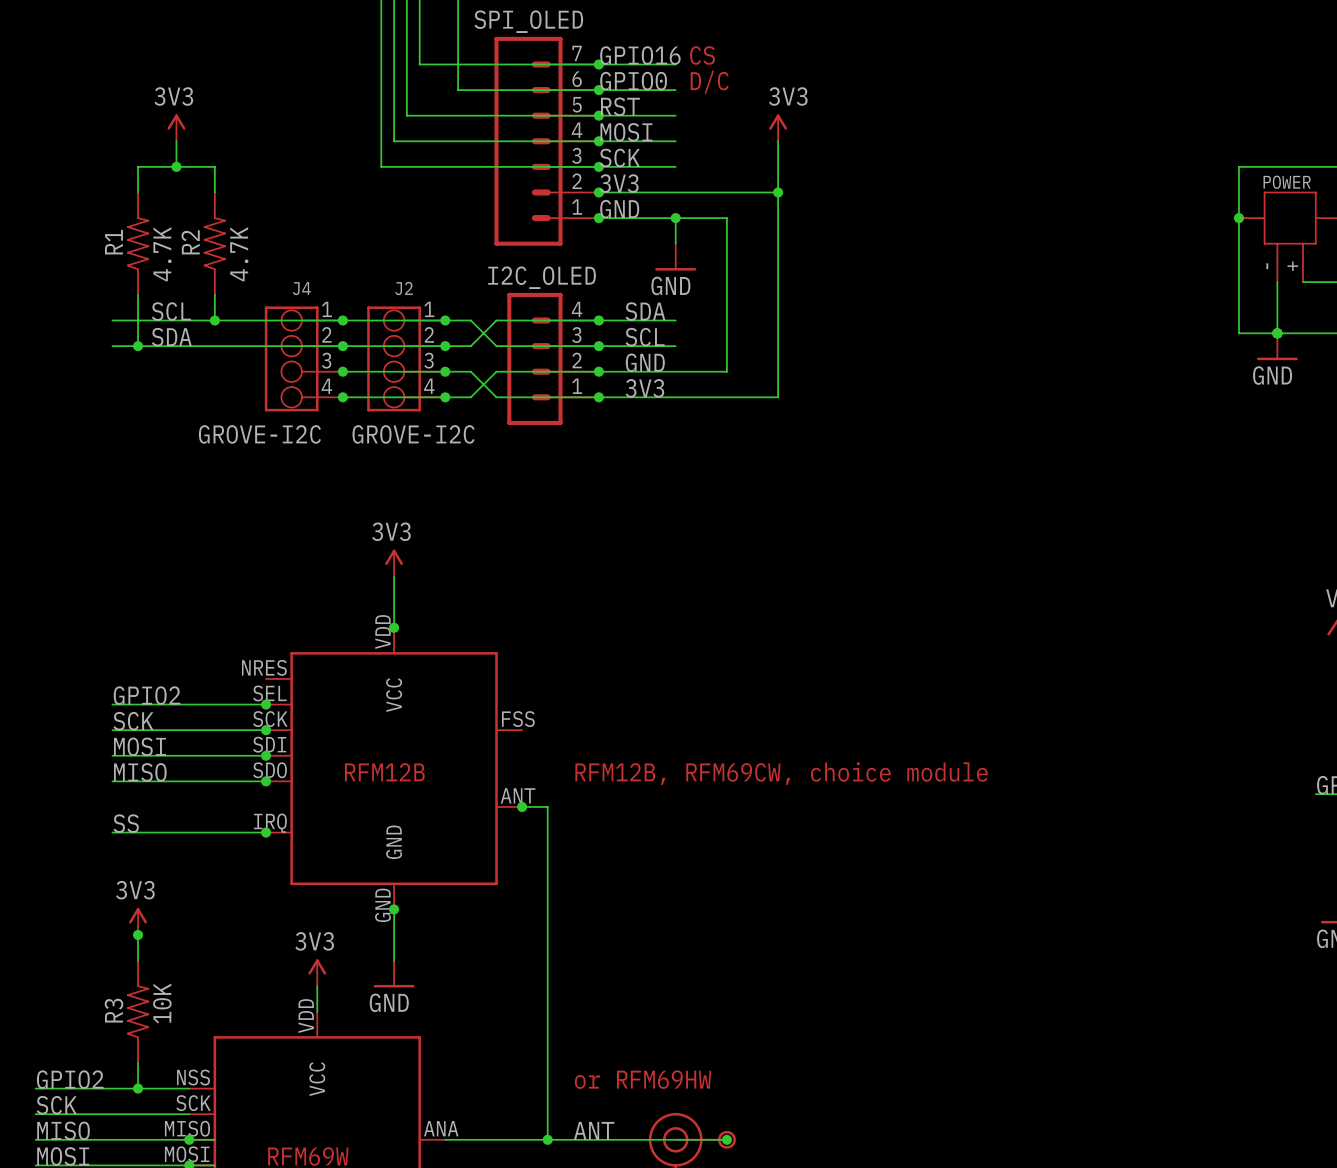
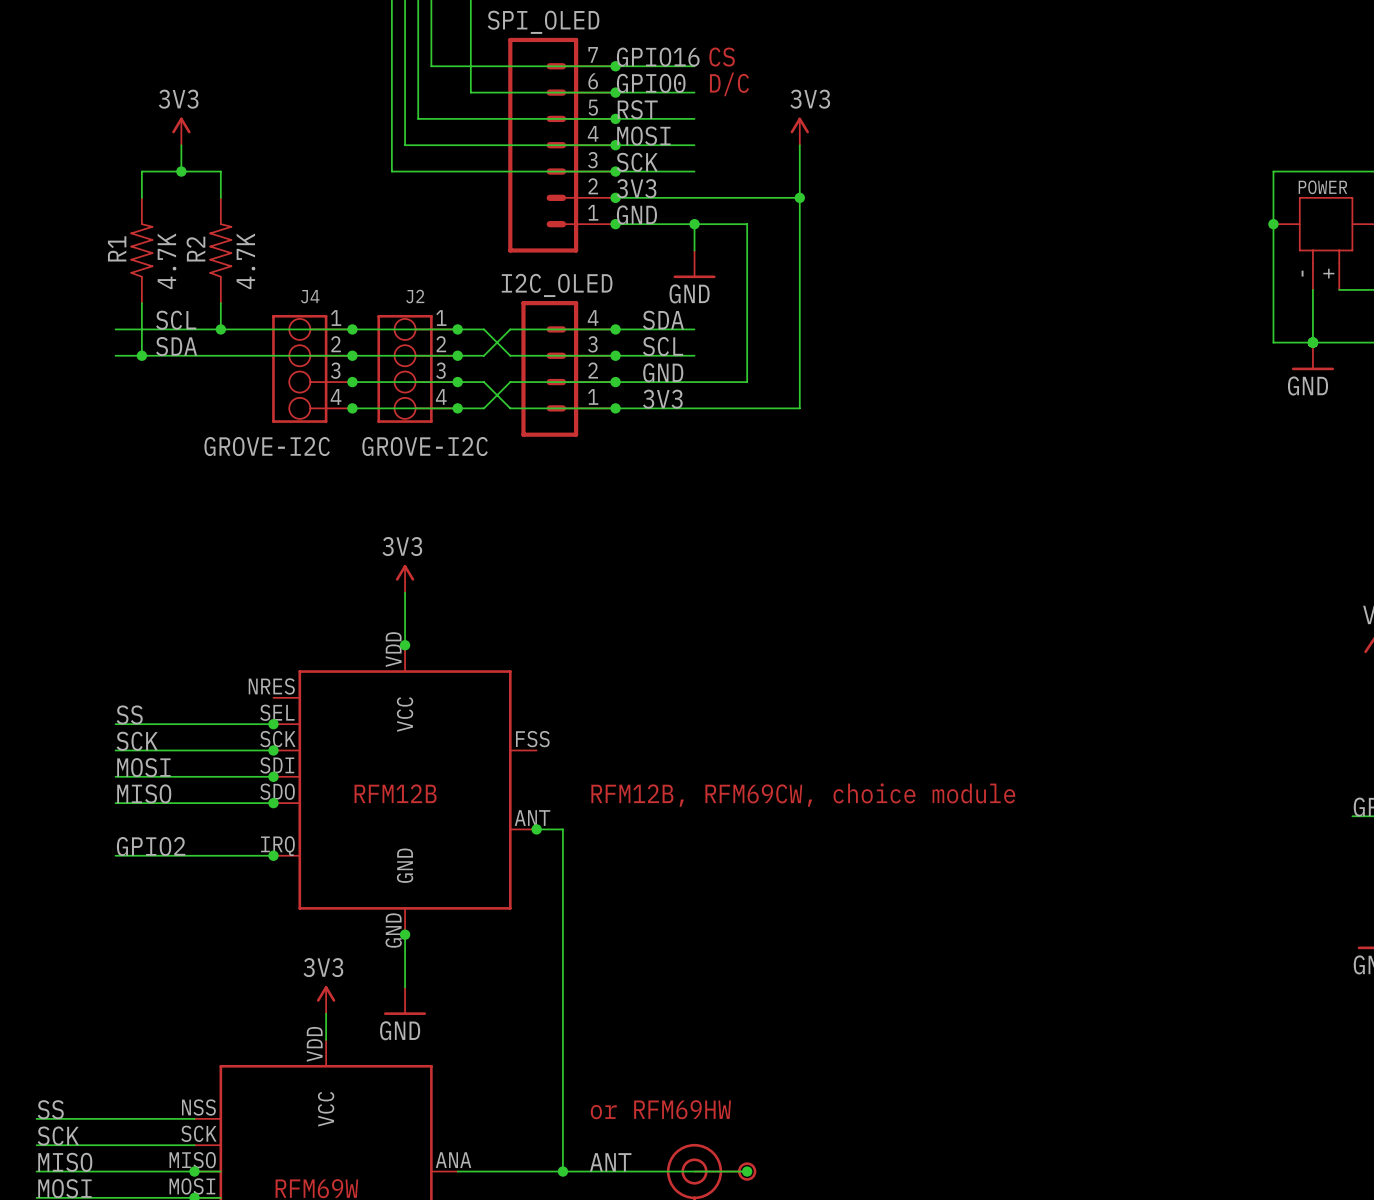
label: GPIO2 (147, 695) -> SS (129, 714)
label: SS (126, 823) -> GPIO2 (151, 846)
power symbol: 3V3 (138, 921) -> none
wire: (138, 934) (138, 960) -> none
junction: (138, 934) -> none
R3: 10K (138, 1011) -> none
wire: (138, 1063) (138, 1088) -> none
label: GPIO2 (70, 1079) -> SS (50, 1109)
junction: (138, 1088) -> none

